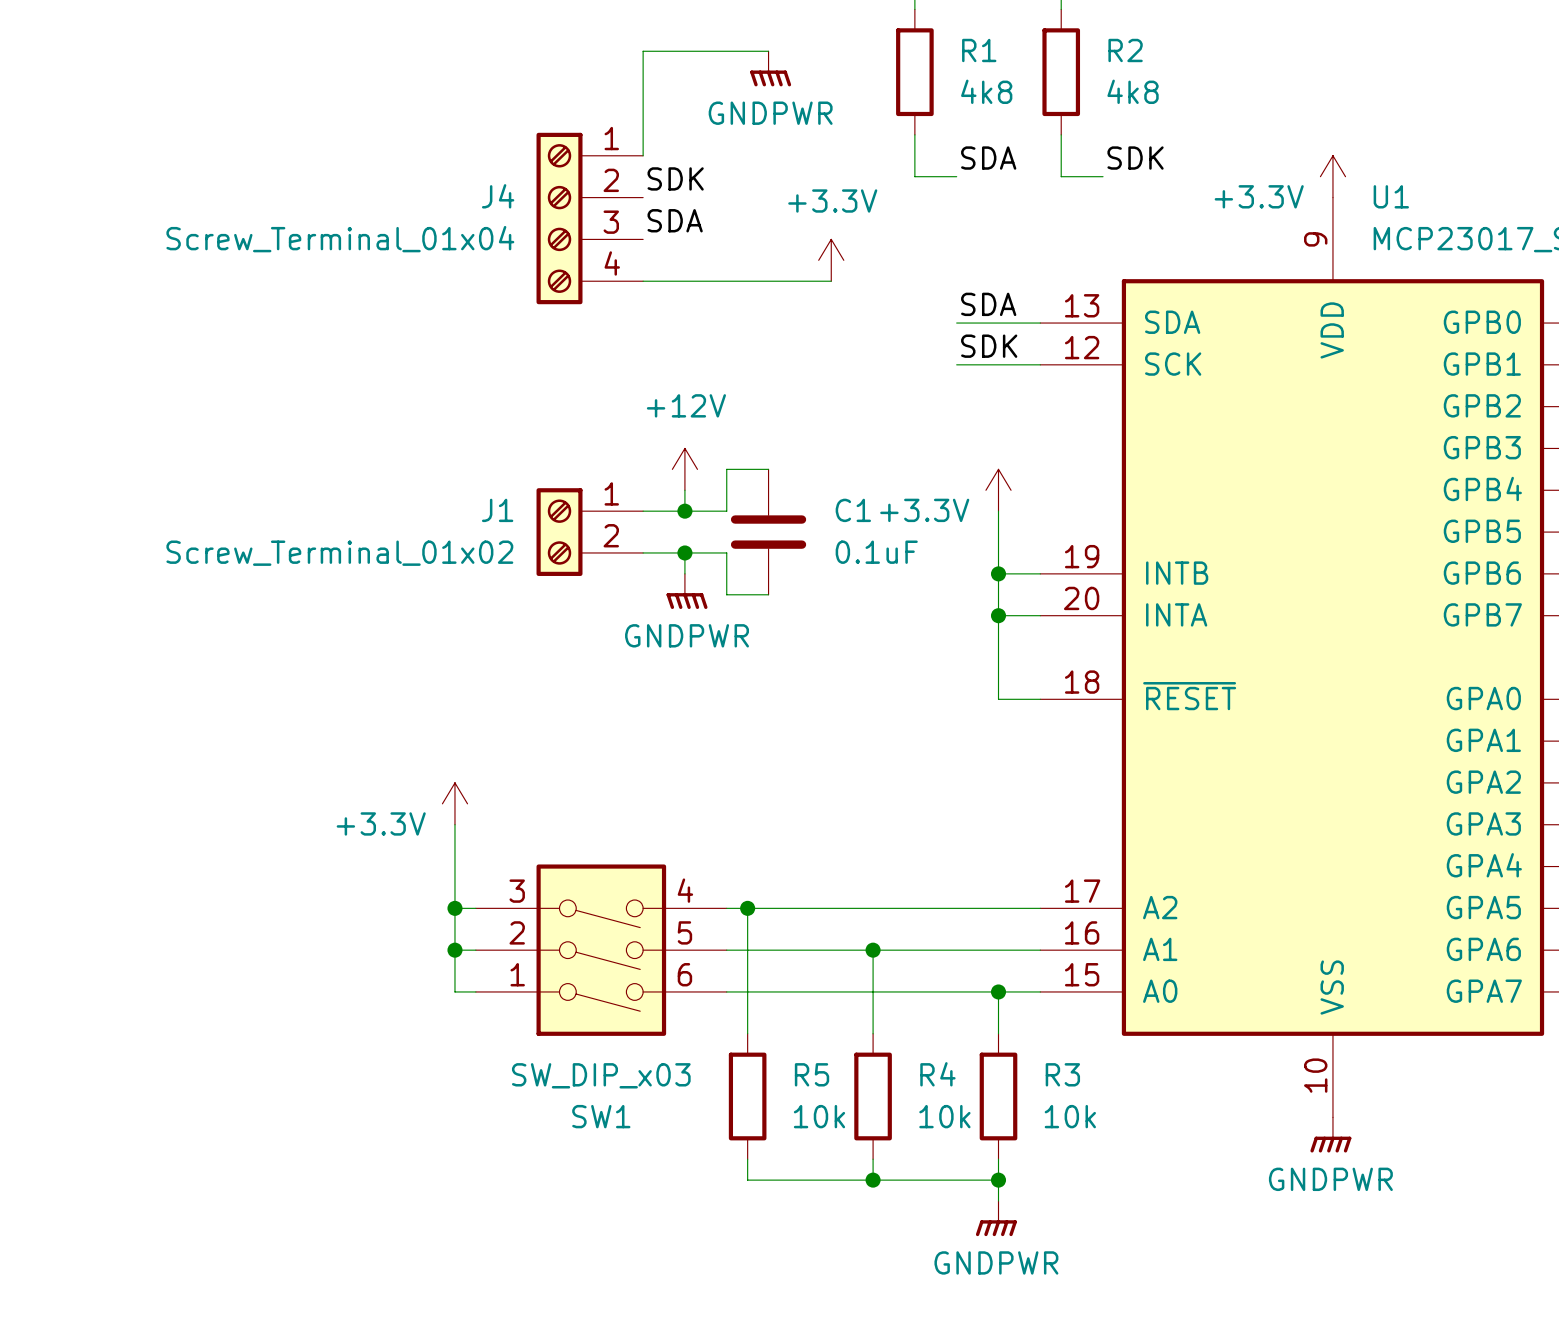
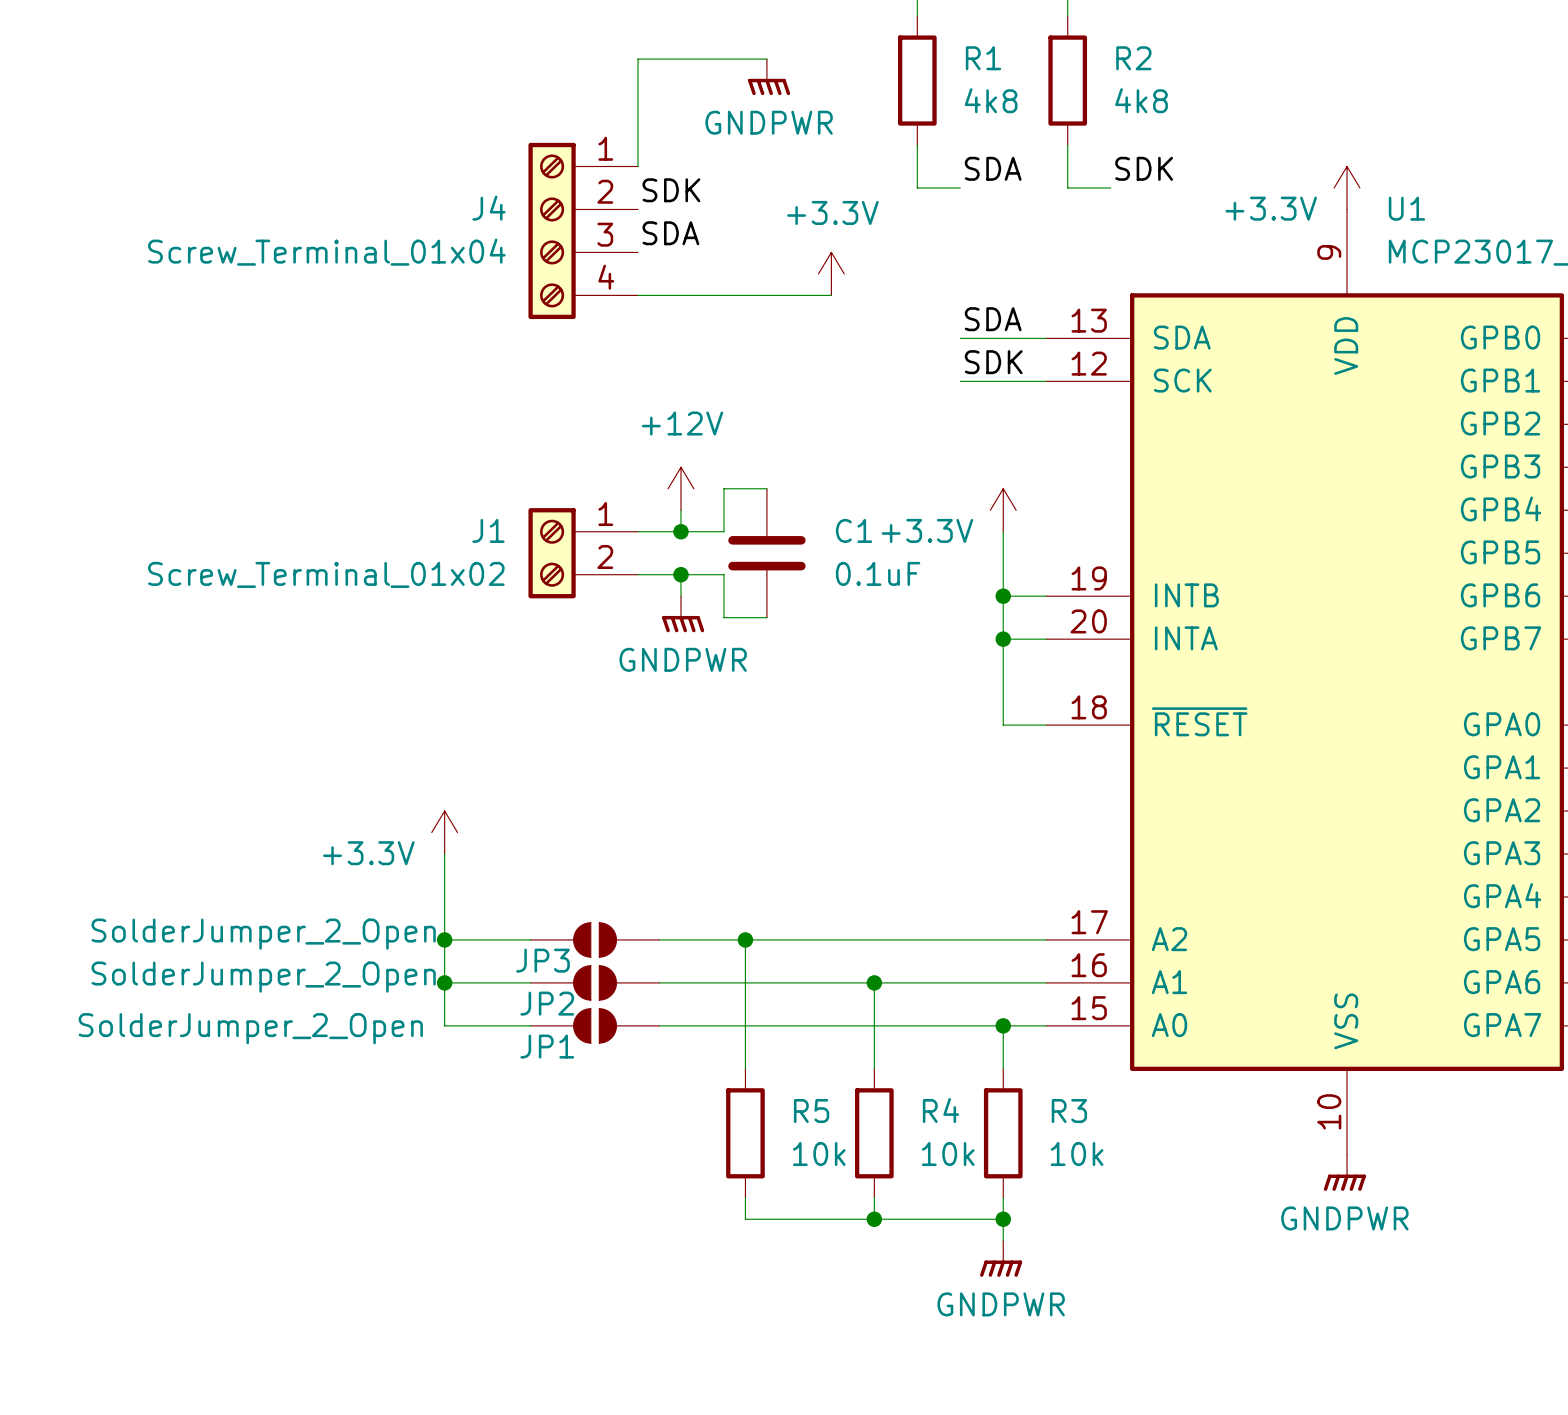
JP3: none -> SolderJumper_2_Open (595, 939)
SW1: SW_DIP_x03 (601, 950) -> none
JP2: none -> SolderJumper_2_Open (595, 982)
JP1: none -> SolderJumper_2_Open (595, 1025)

